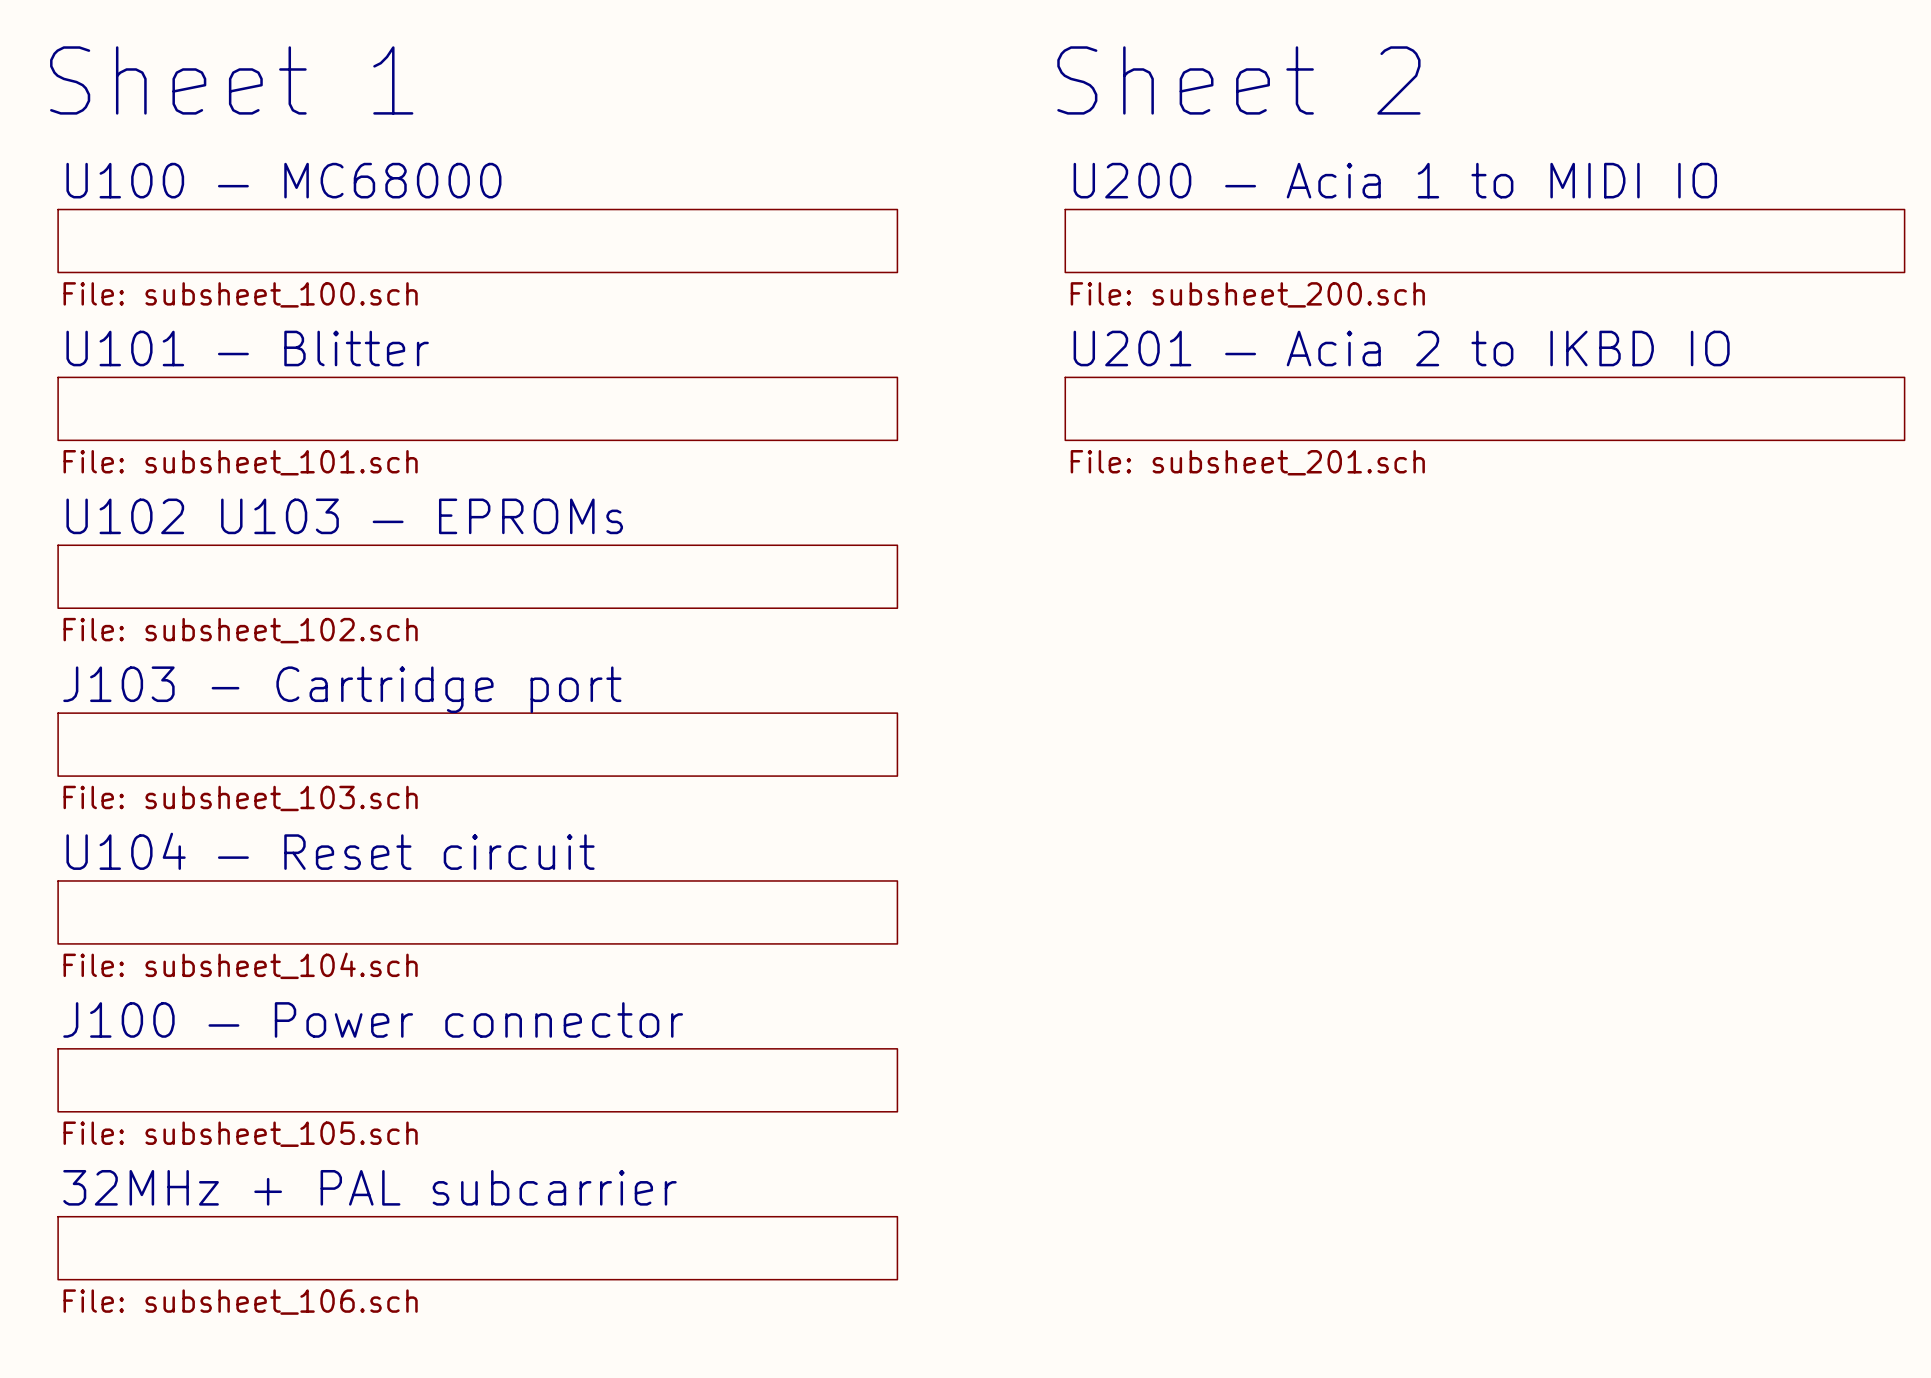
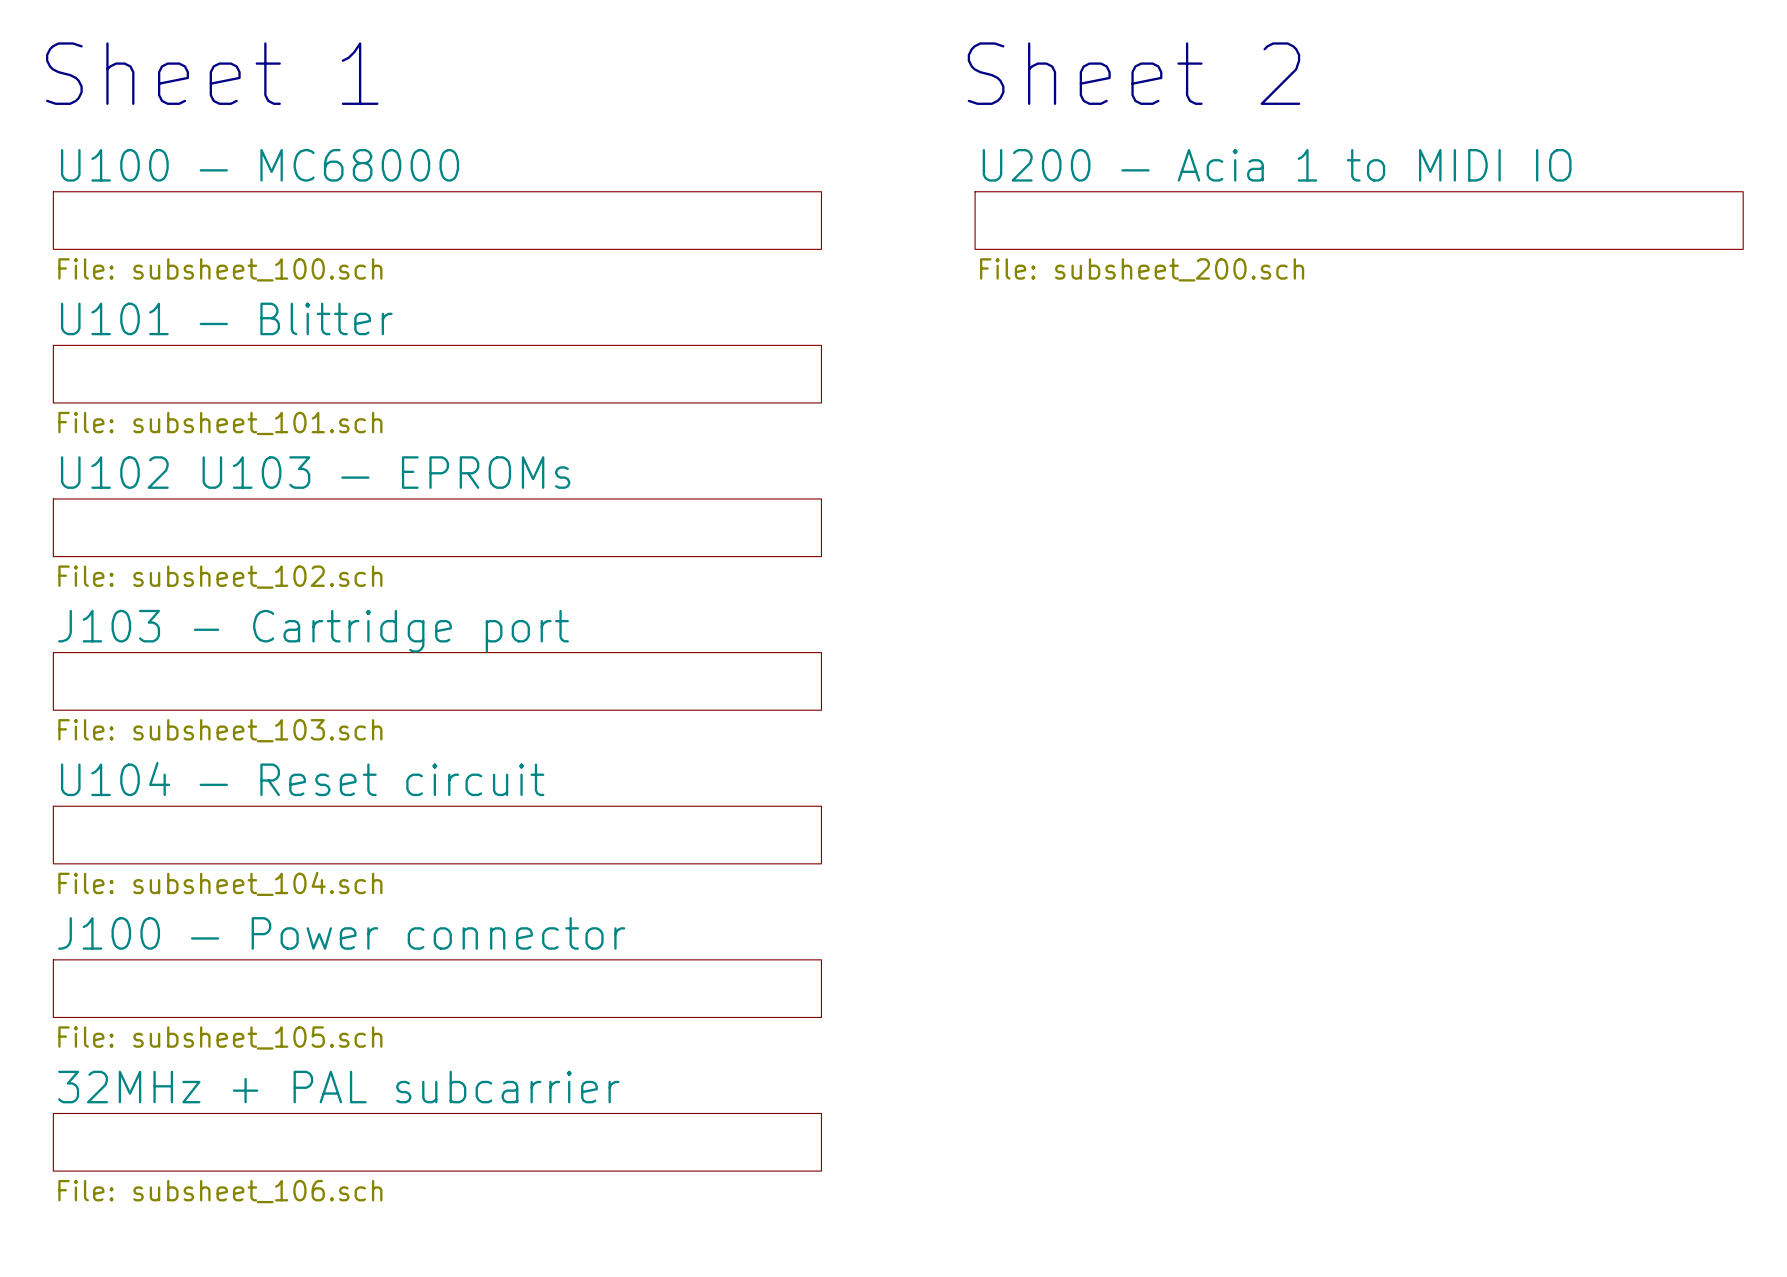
sheet U201 — Acia 2 to IKBD IO: File: subsheet_201.sch (1484, 408) -> none

